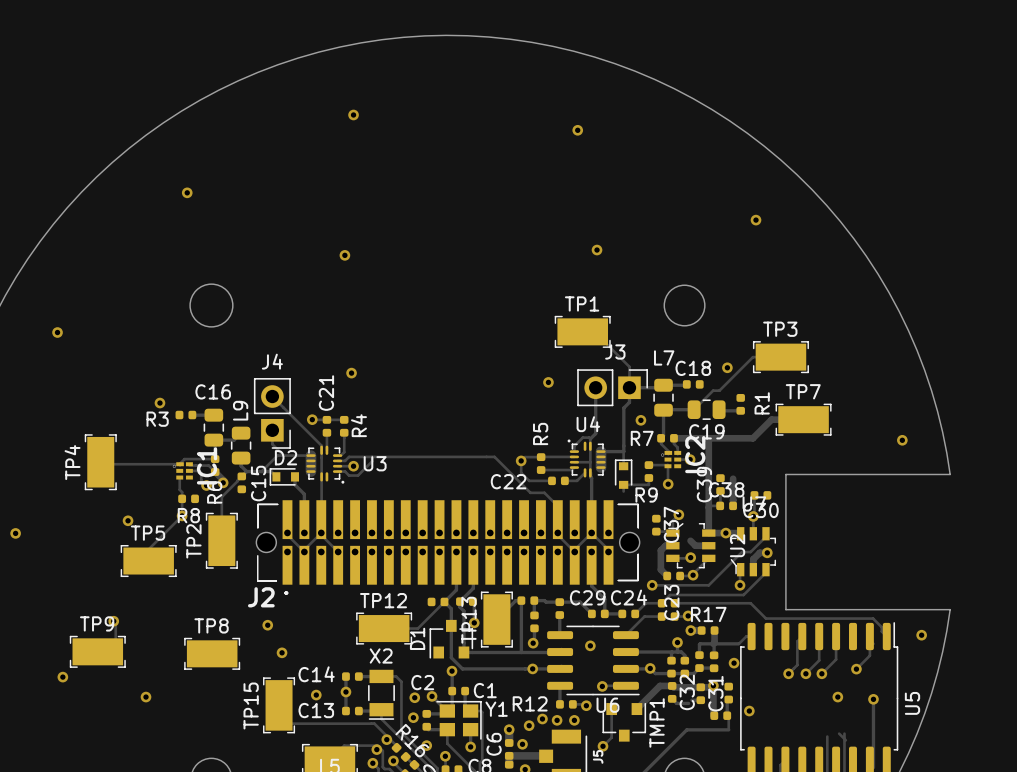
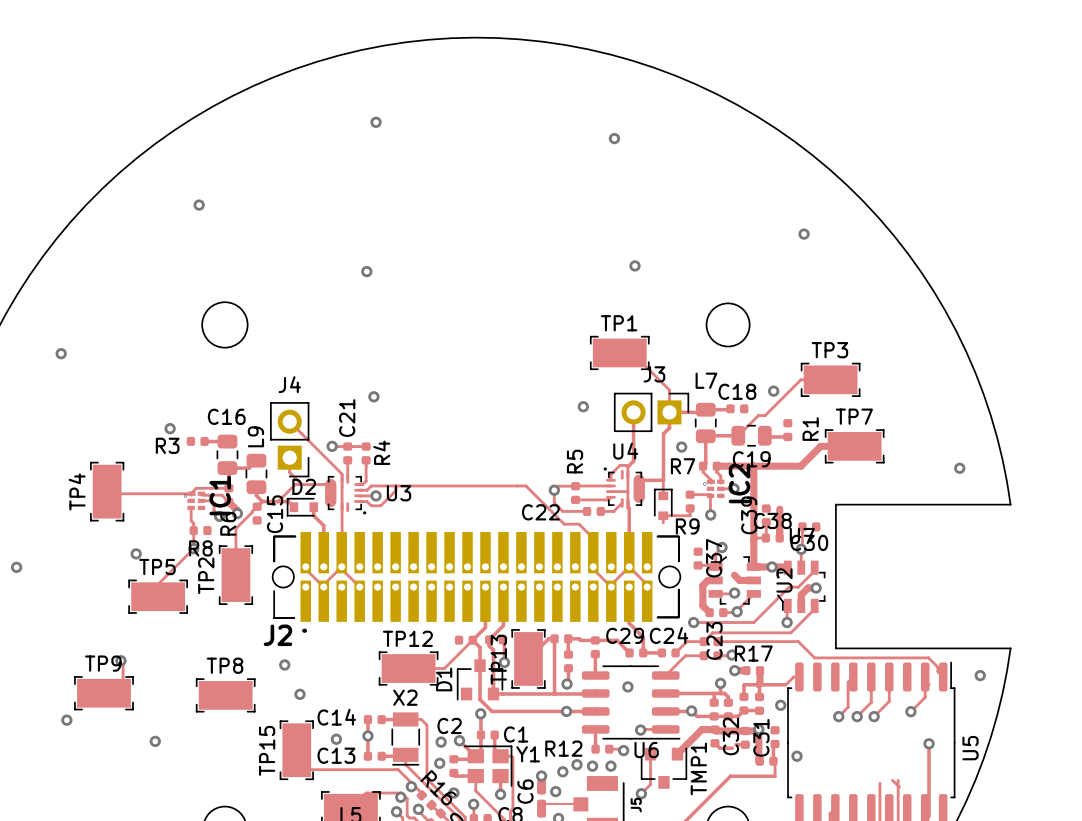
via: (837, 697) -> none
track width: thick (509, 755) (546, 756) -> thin (541, 803) (580, 804)

